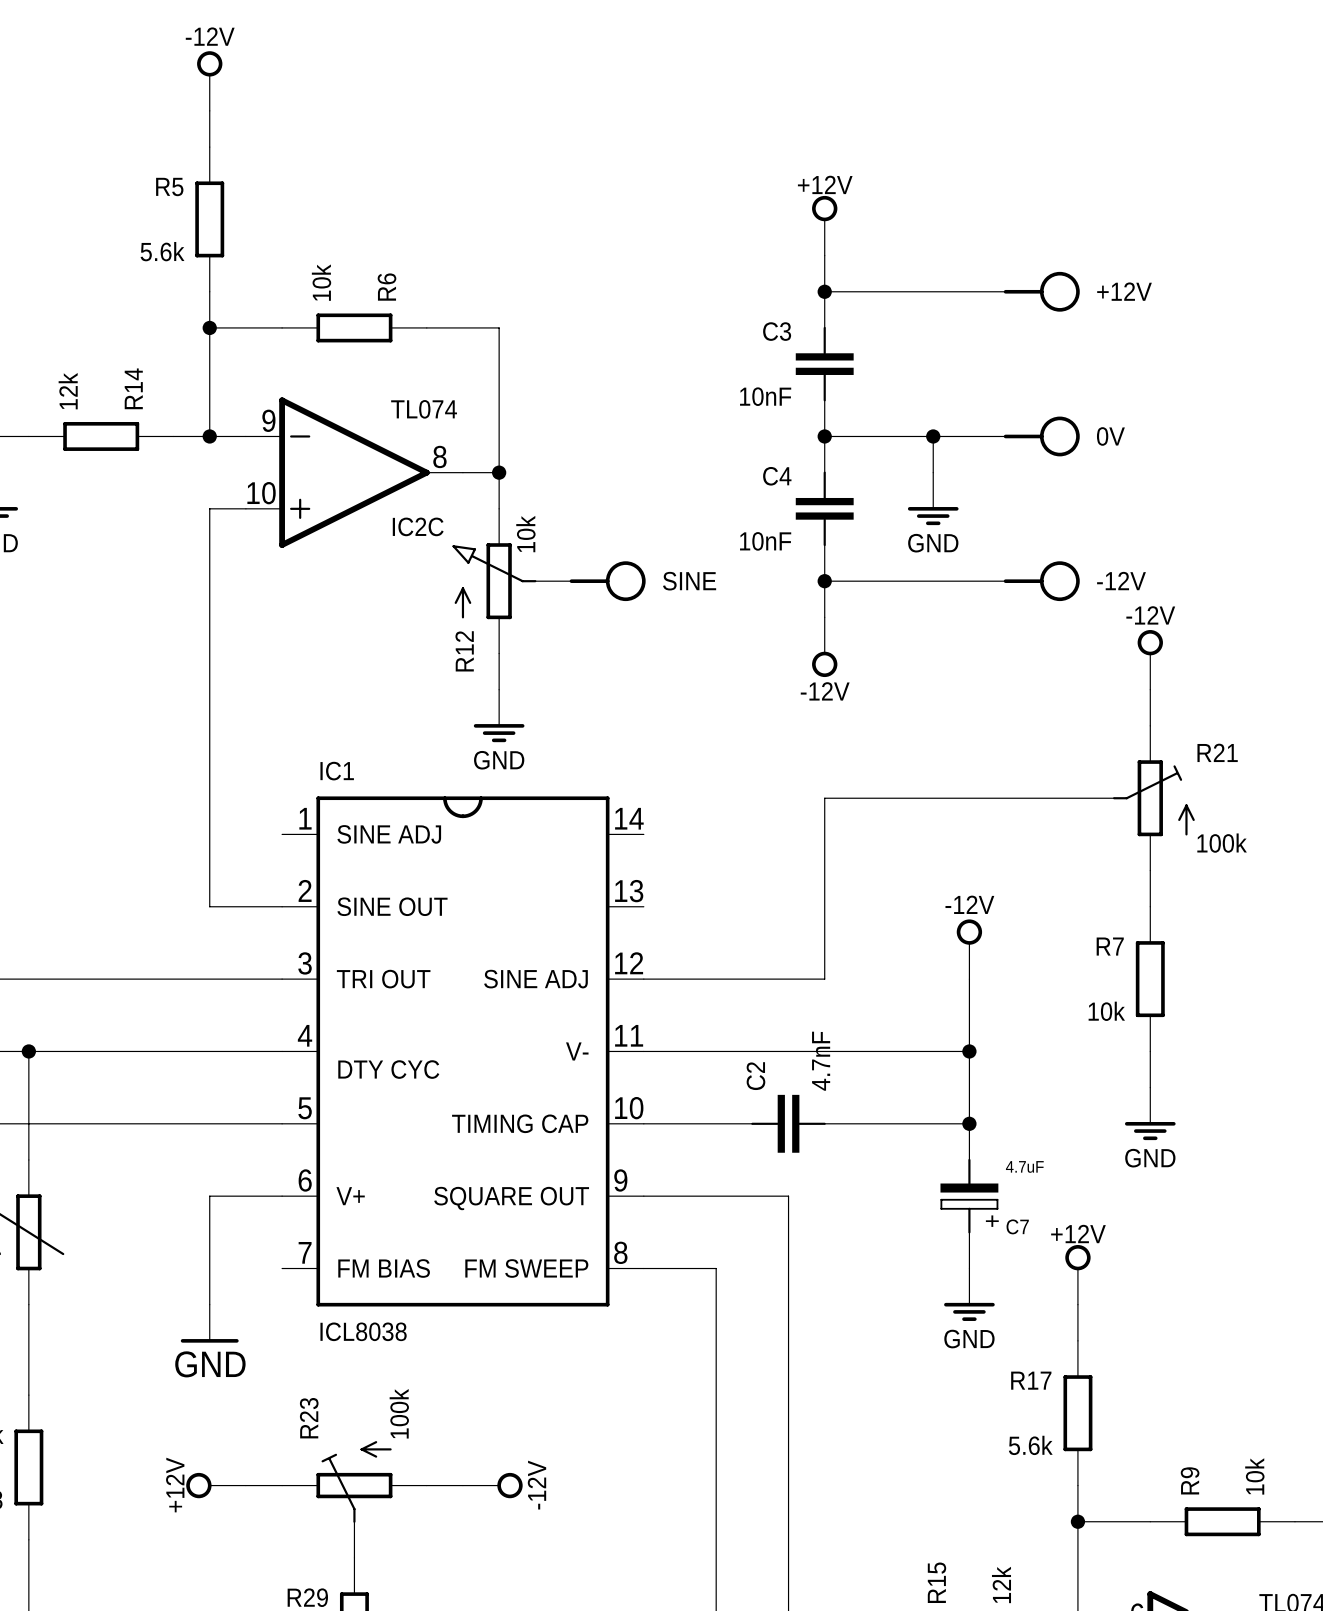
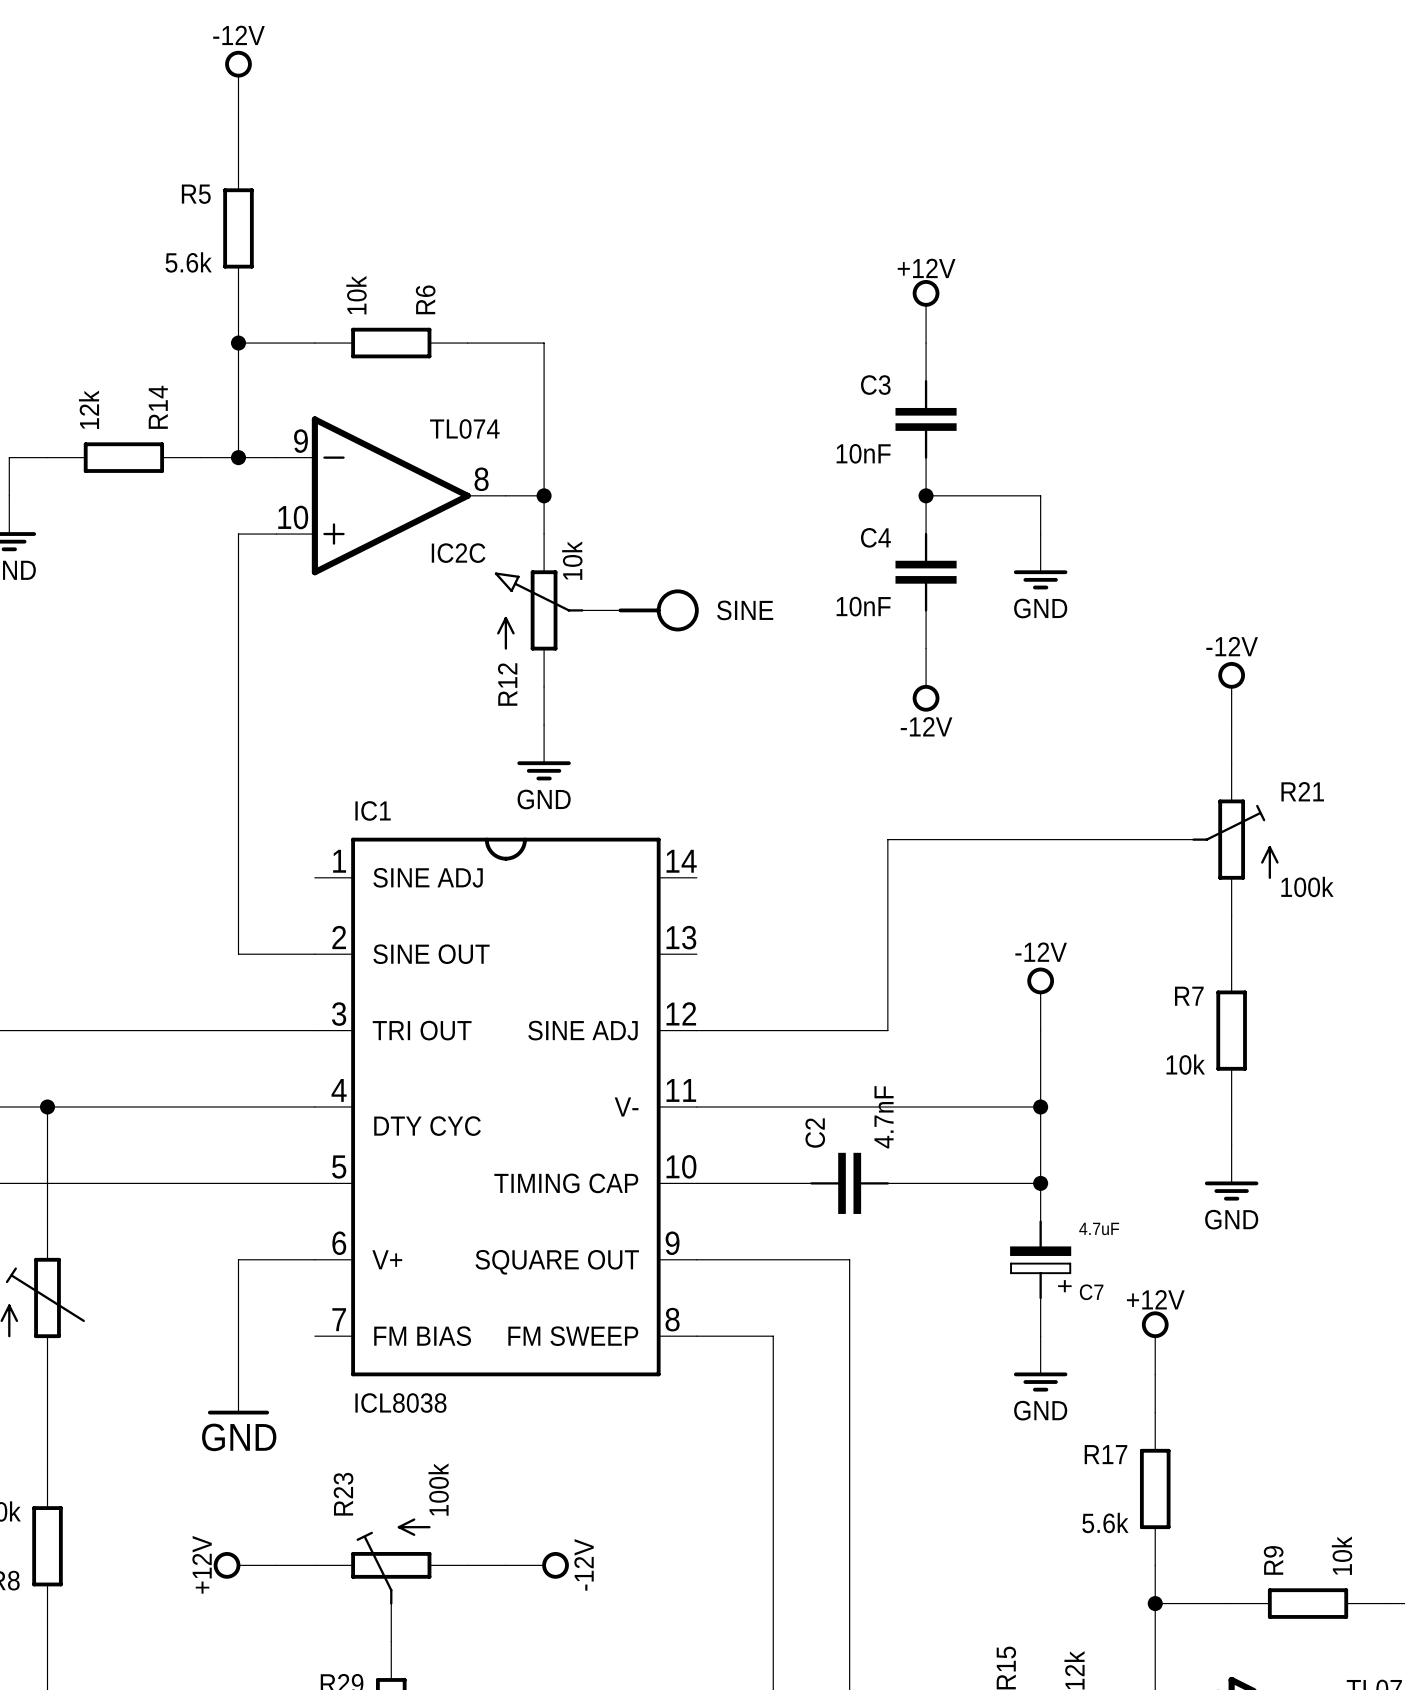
power symbol position: +12V (824, 225) -> +12V (926, 311)
wire: (824, 255) (824, 327) -> none
wire: (824, 291) (1005, 291) -> none
junction: (824, 291) -> none
+12V: (1041, 291) -> none
C3 position: (824, 364) -> (926, 419)
wire: (824, 400) (824, 472) -> (926, 457) (926, 534)
wire: (824, 436) (1005, 436) -> none
junction: (824, 436) -> none
wire: (933, 436) (933, 472) -> (926, 343) (926, 381)
junction: (933, 436) -> none
0V: (1041, 436) -> none
wire: none -> (926, 495) (1040, 495) (1040, 534)
junction: none -> (926, 495)
power symbol position: GND (933, 498) -> GND (1040, 561)
C4 position: (824, 508) -> (926, 572)
wire: (824, 545) (824, 617) -> none
wire: (824, 581) (1005, 581) -> none
junction: (824, 581) -> none
wire: none -> (926, 610) (926, 648)
-12V: (1041, 581) -> none
power symbol position: -12V (824, 647) -> -12V (926, 680)

